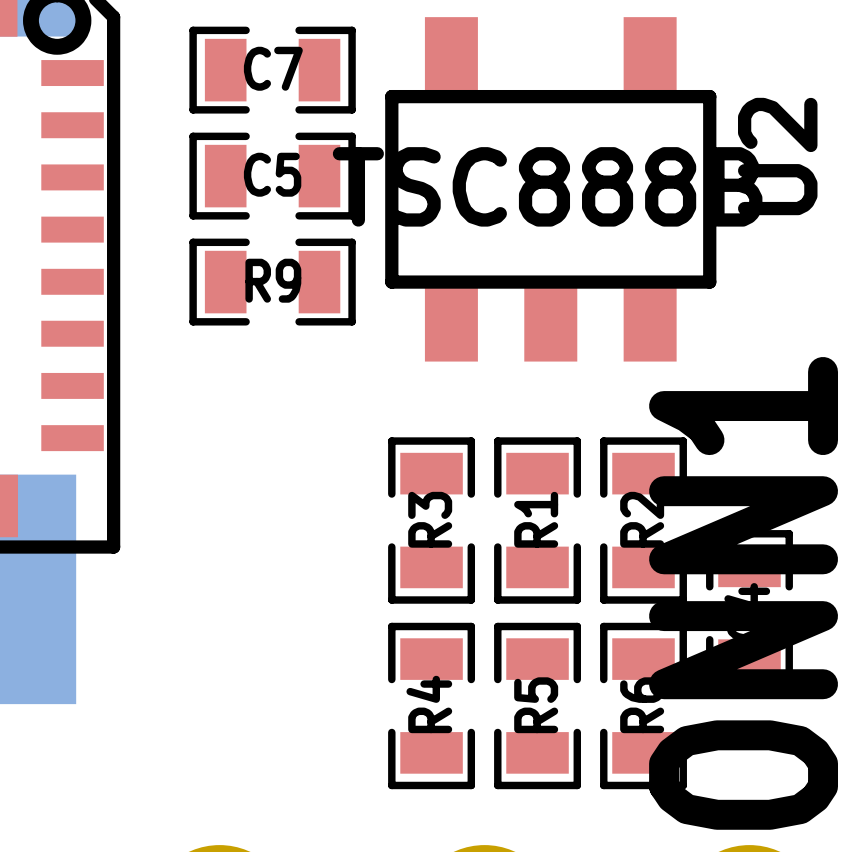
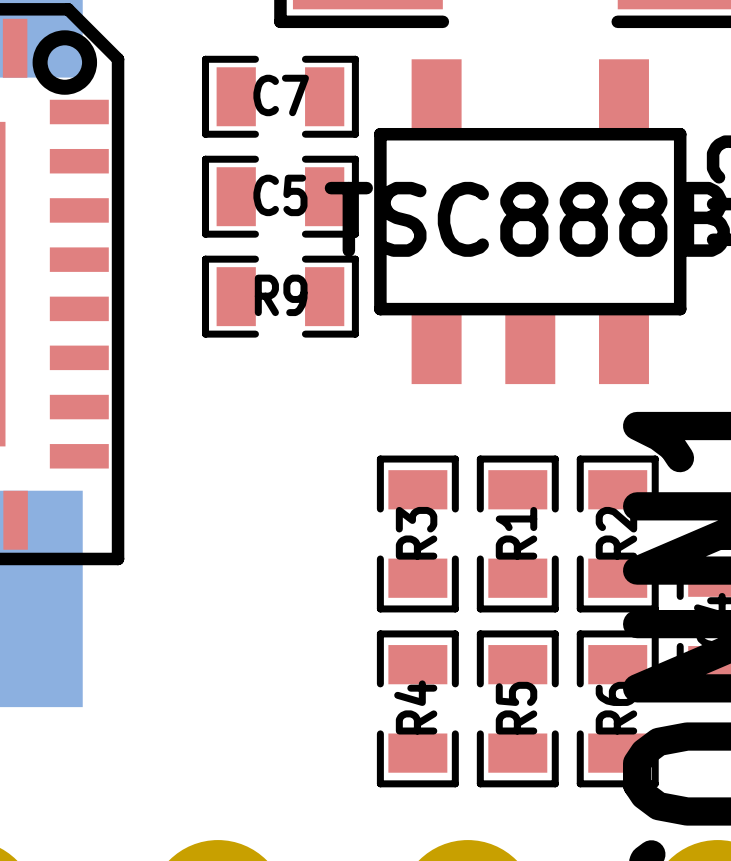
C7 position: (272, 70) -> (280, 96)
C5 position: (272, 176) -> (280, 196)
R9 position: (272, 282) -> (280, 296)

